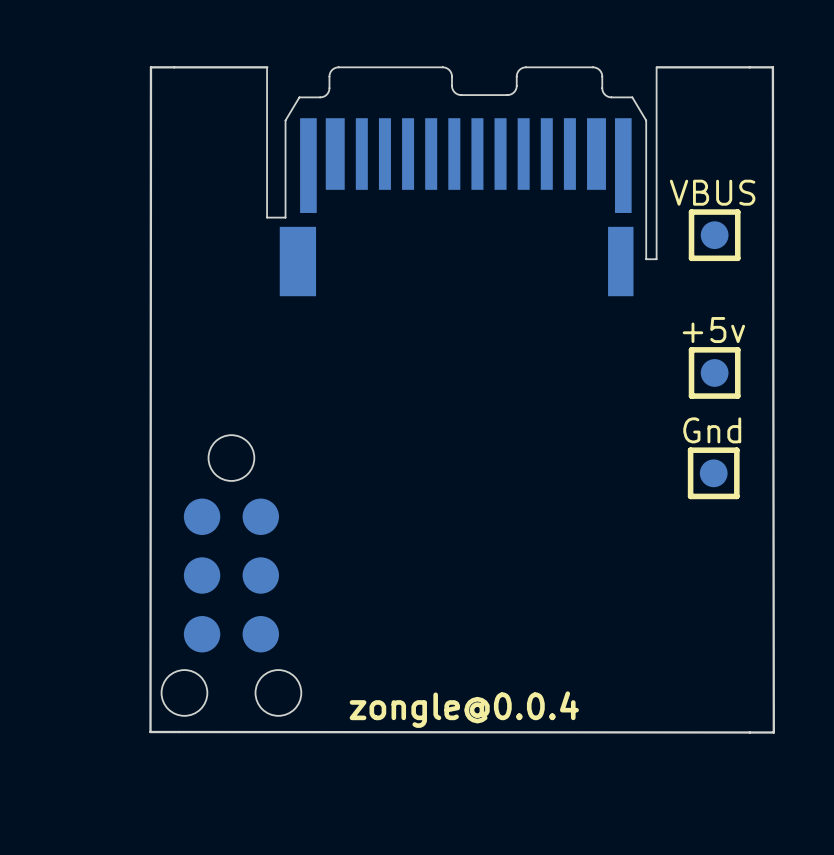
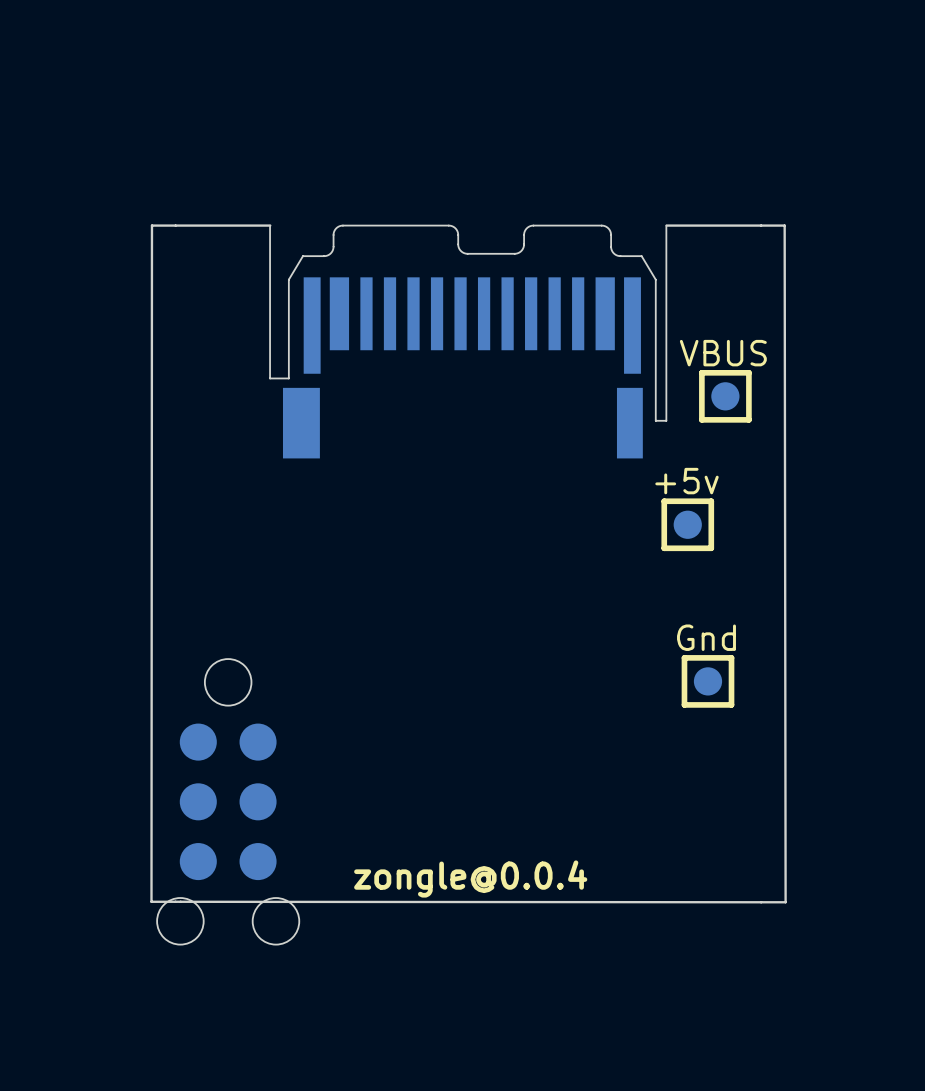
part position: (714, 372) -> (687, 524)
part position: (713, 473) -> (707, 681)
part position: (231, 575) -> (228, 801)

